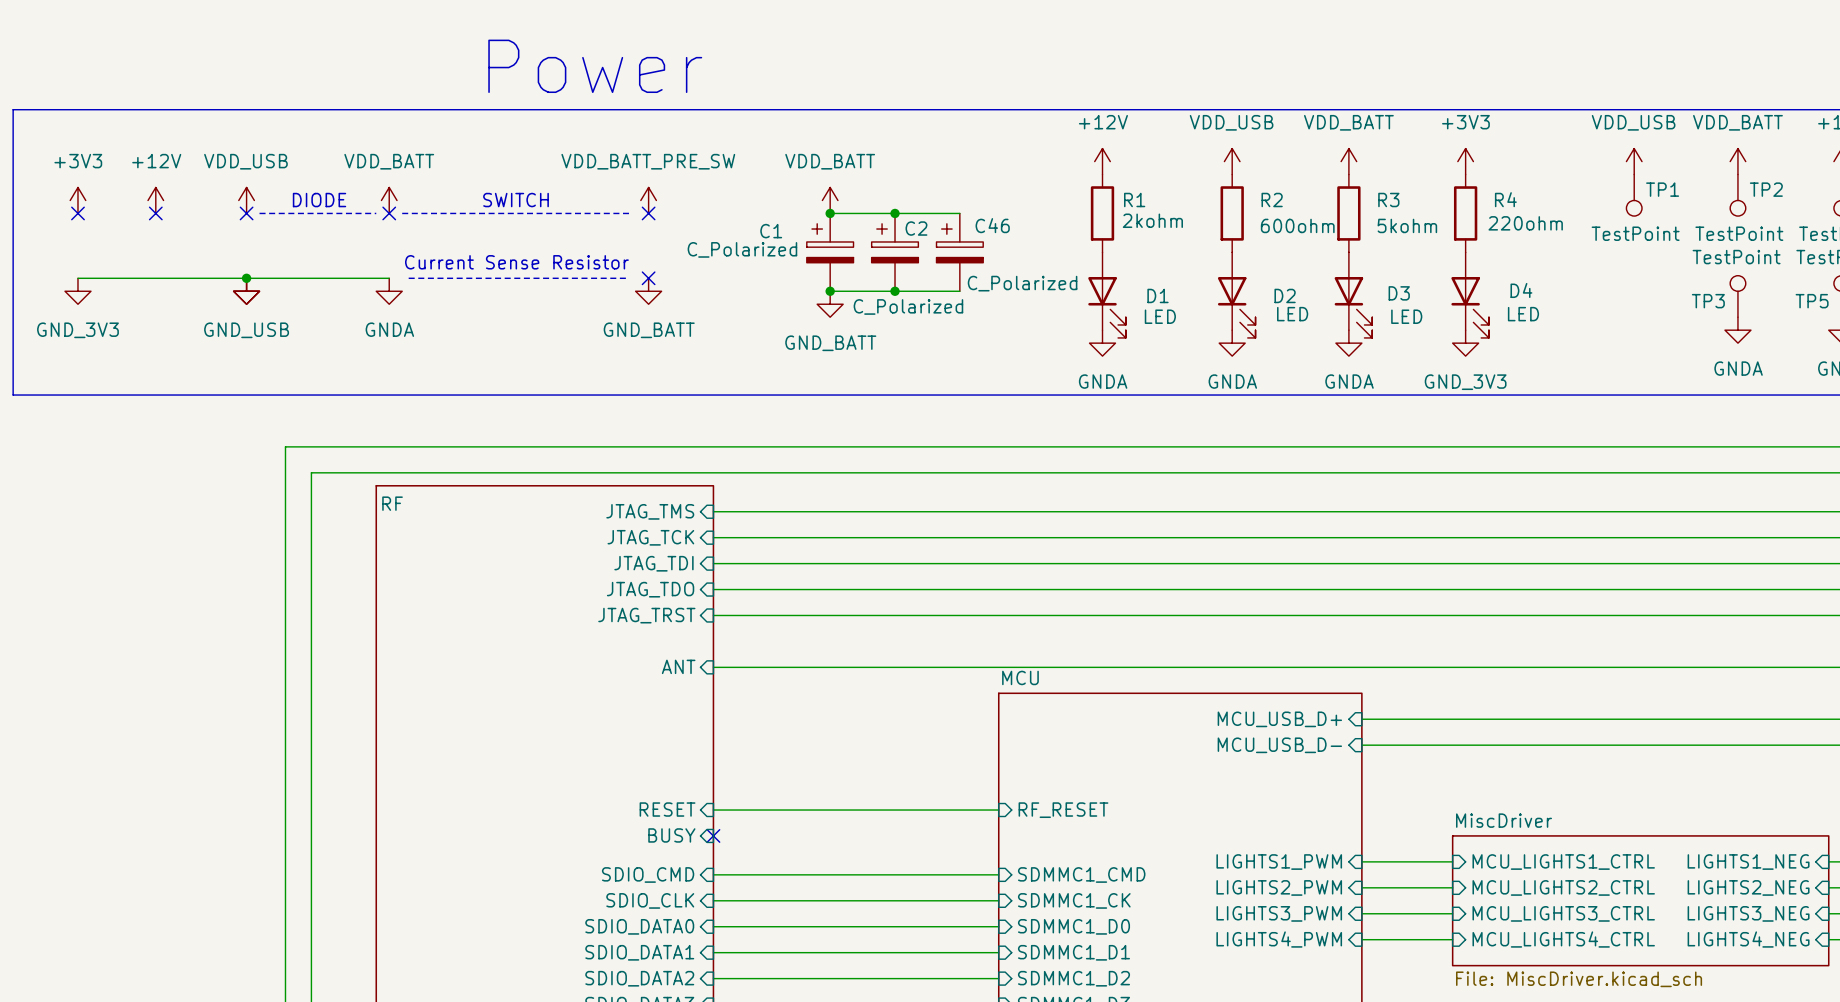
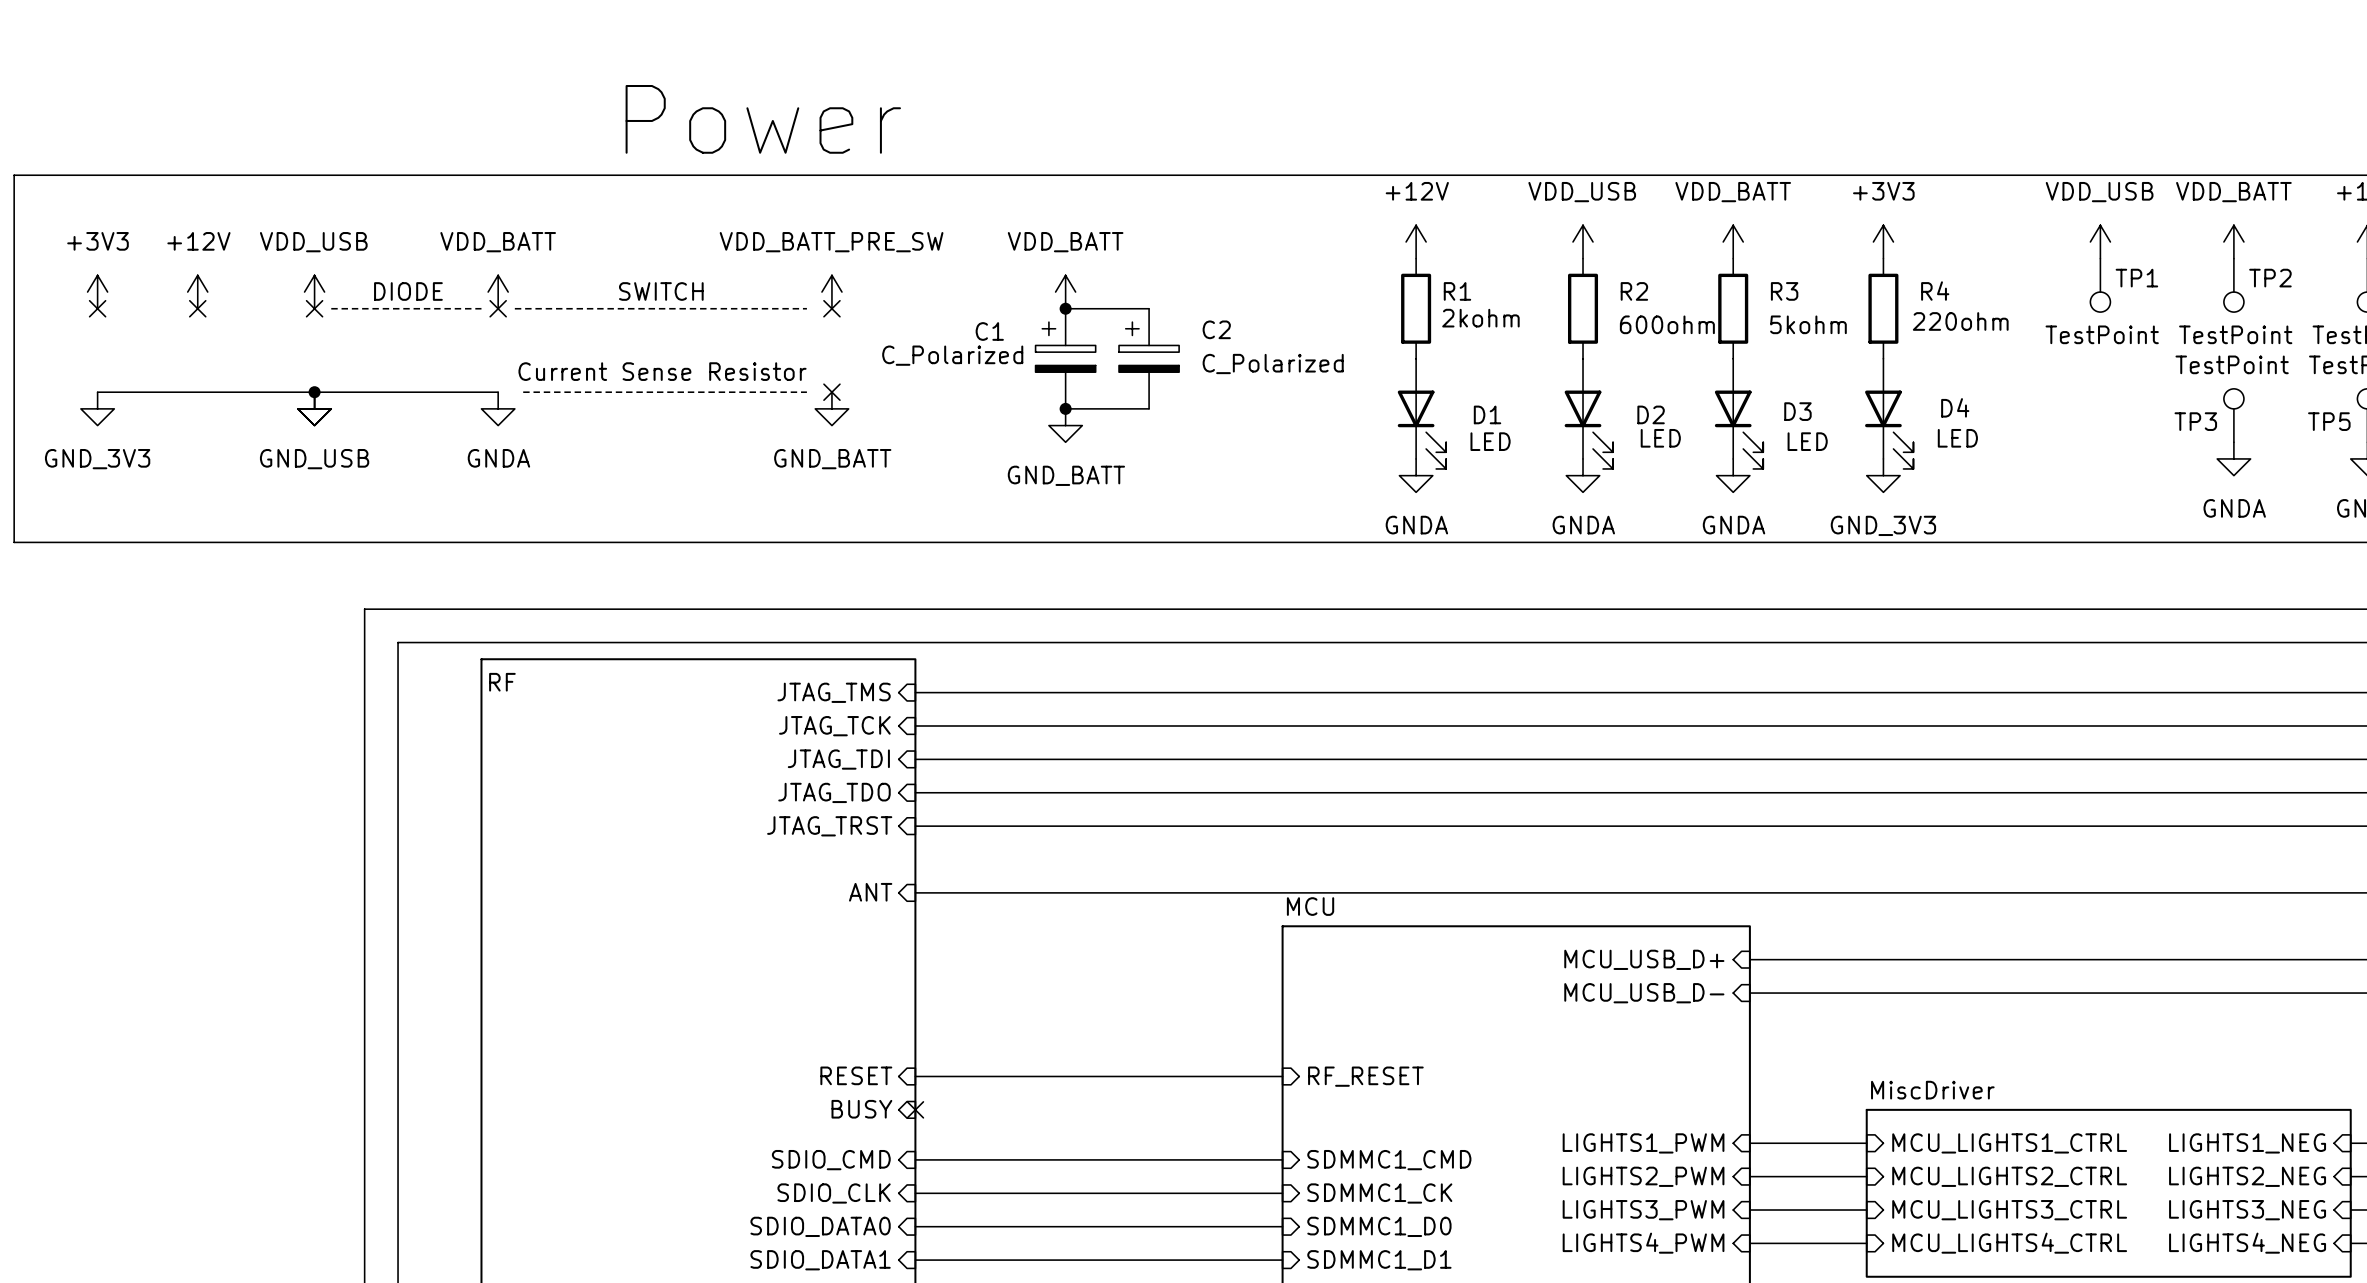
wire: (895, 213) (959, 213) -> none
junction: (895, 213) -> none
C2 name position: C2 (916, 228) -> C2 (1216, 329)
C46: C_Polarized (959, 252) -> none
wire: (895, 291) (959, 291) -> none
junction: (895, 291) -> none
C2 value position: C_Polarized (908, 306) -> C_Polarized (1273, 363)

